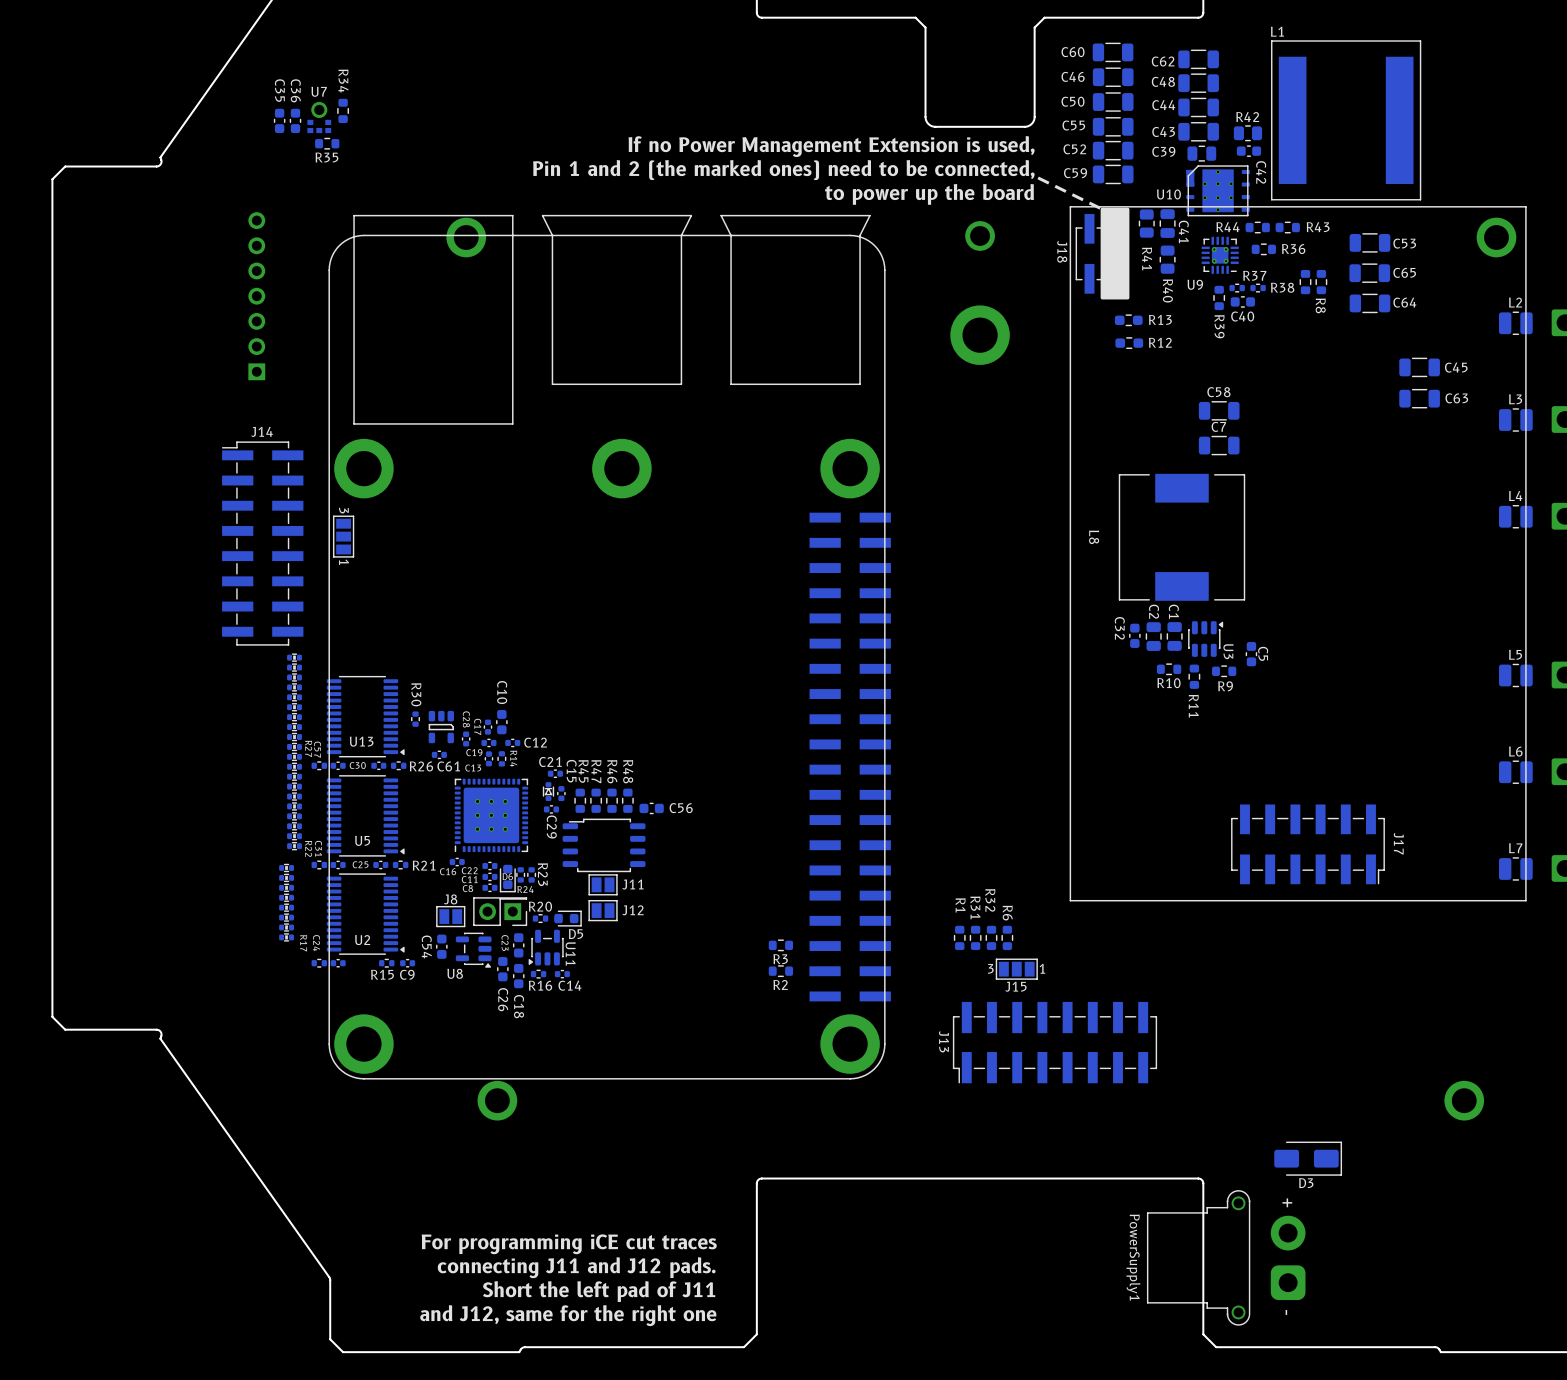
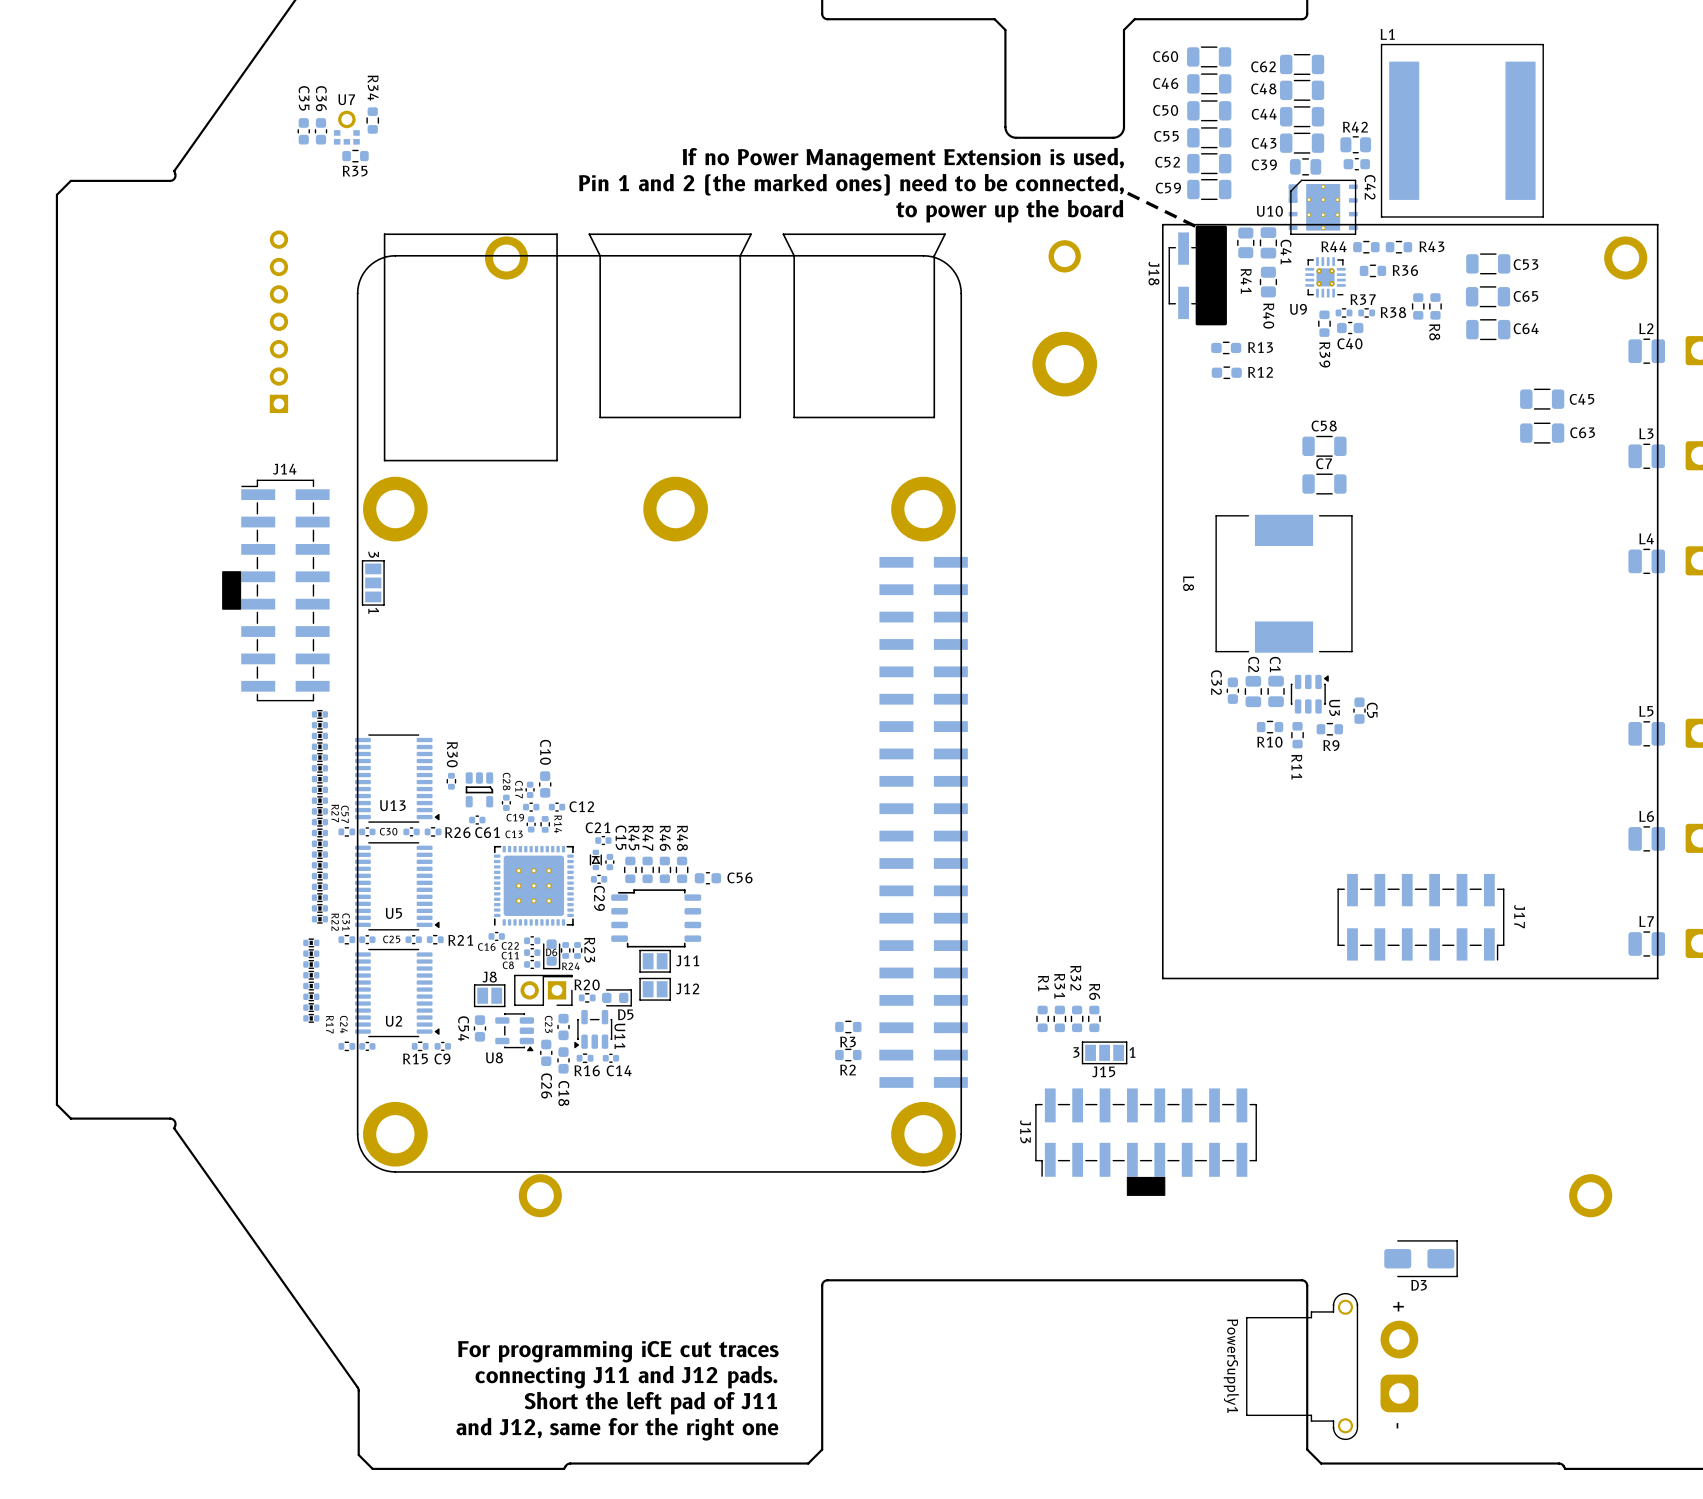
J14 footprint: [222, 441, 304, 646] -> [222, 479, 330, 702]
J13 footprint: [952, 1001, 1157, 1084] -> [1035, 1088, 1257, 1196]

